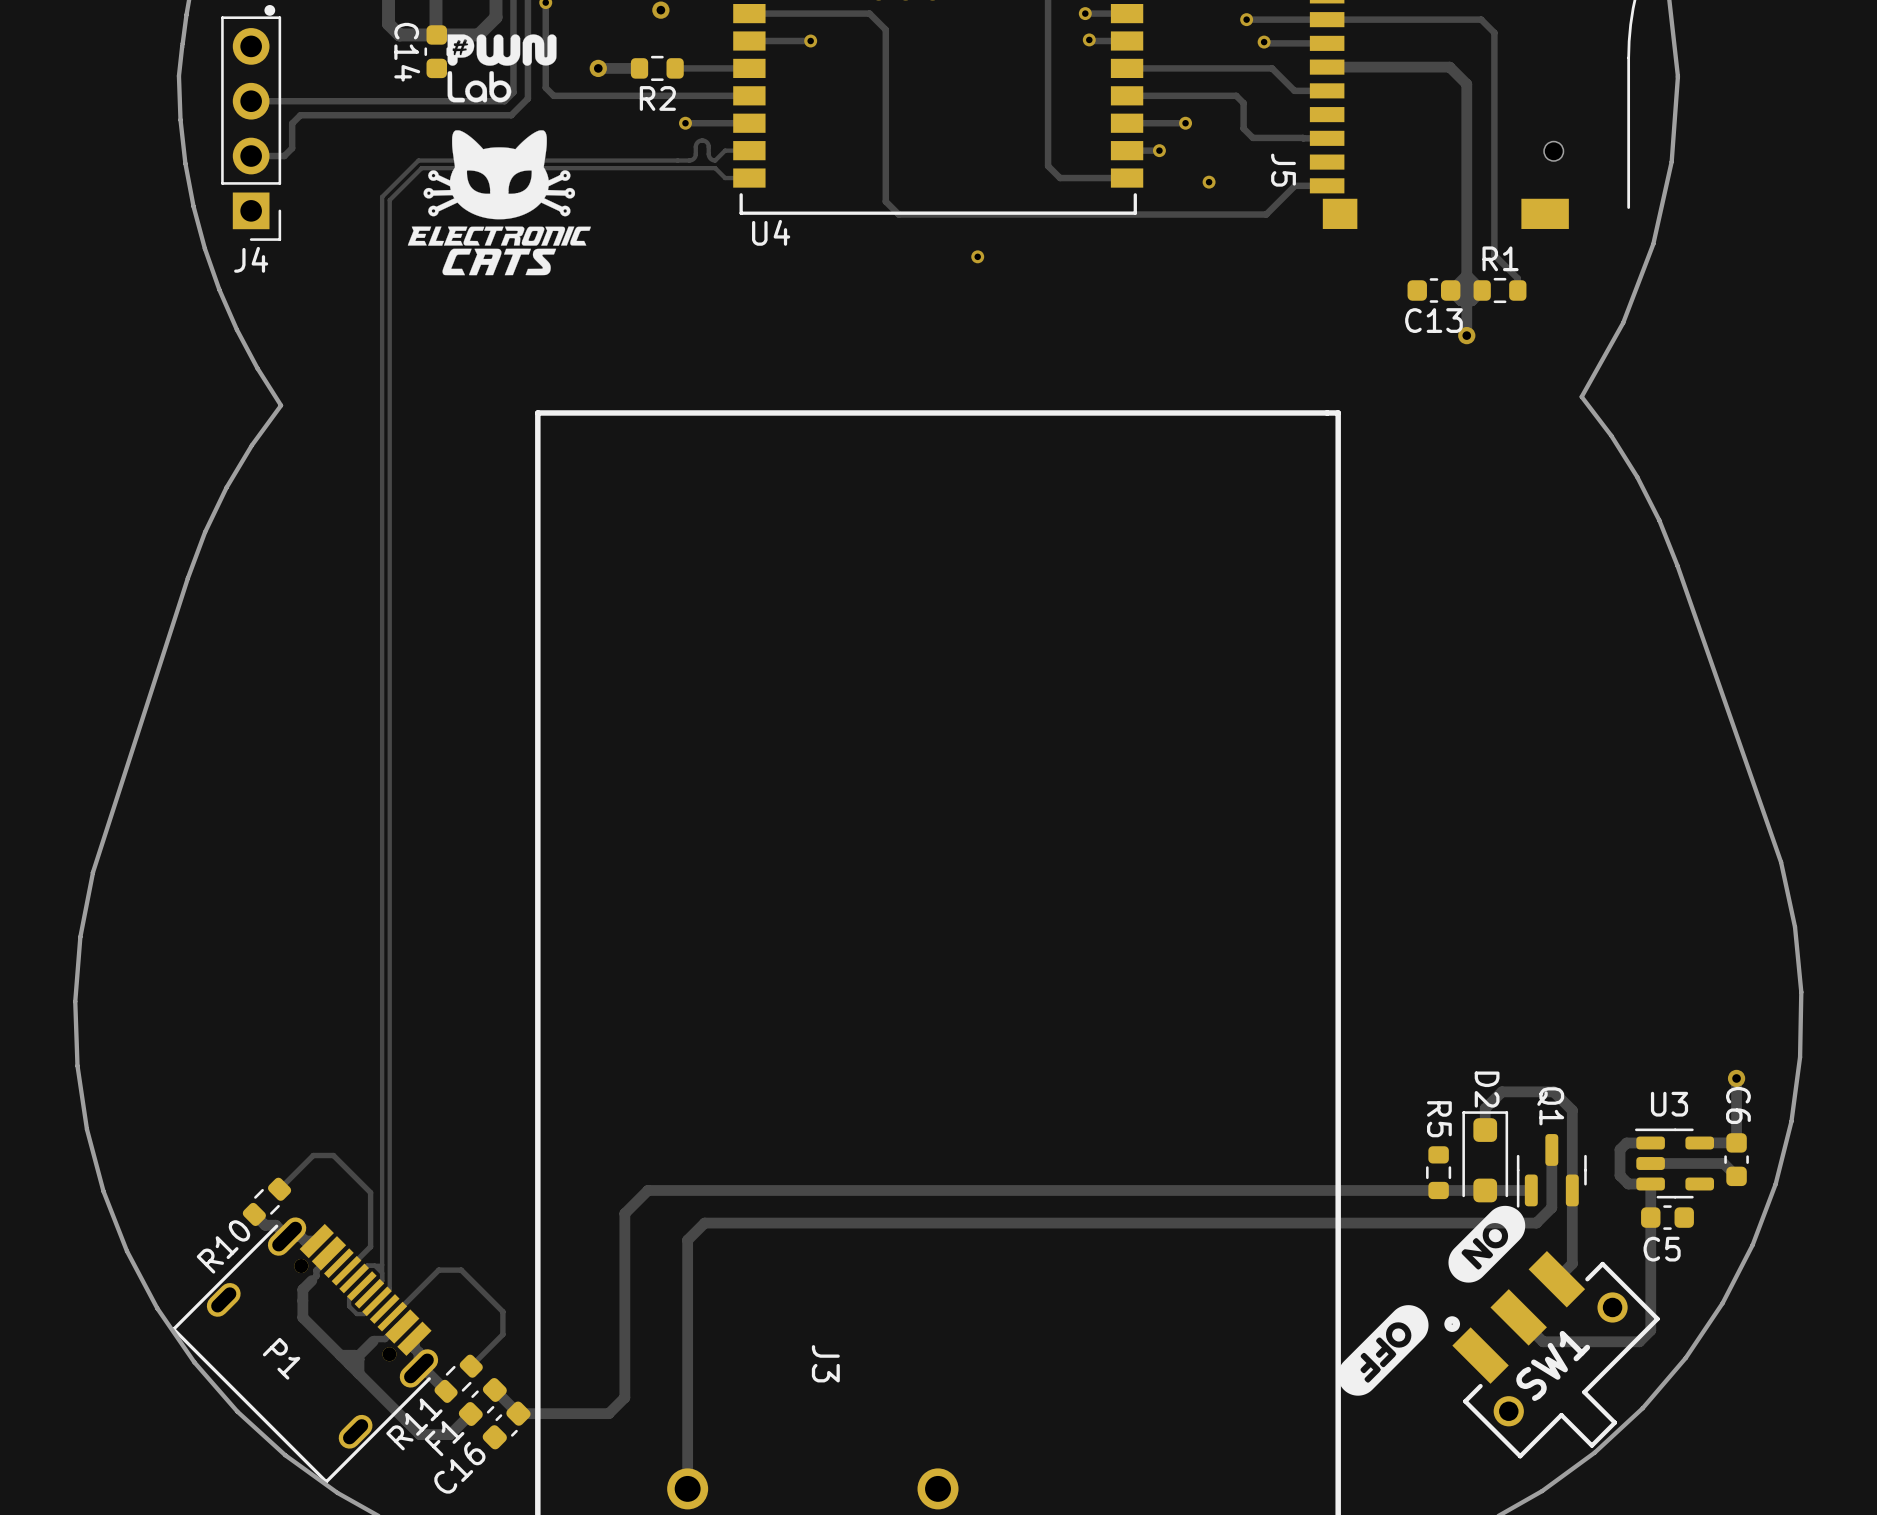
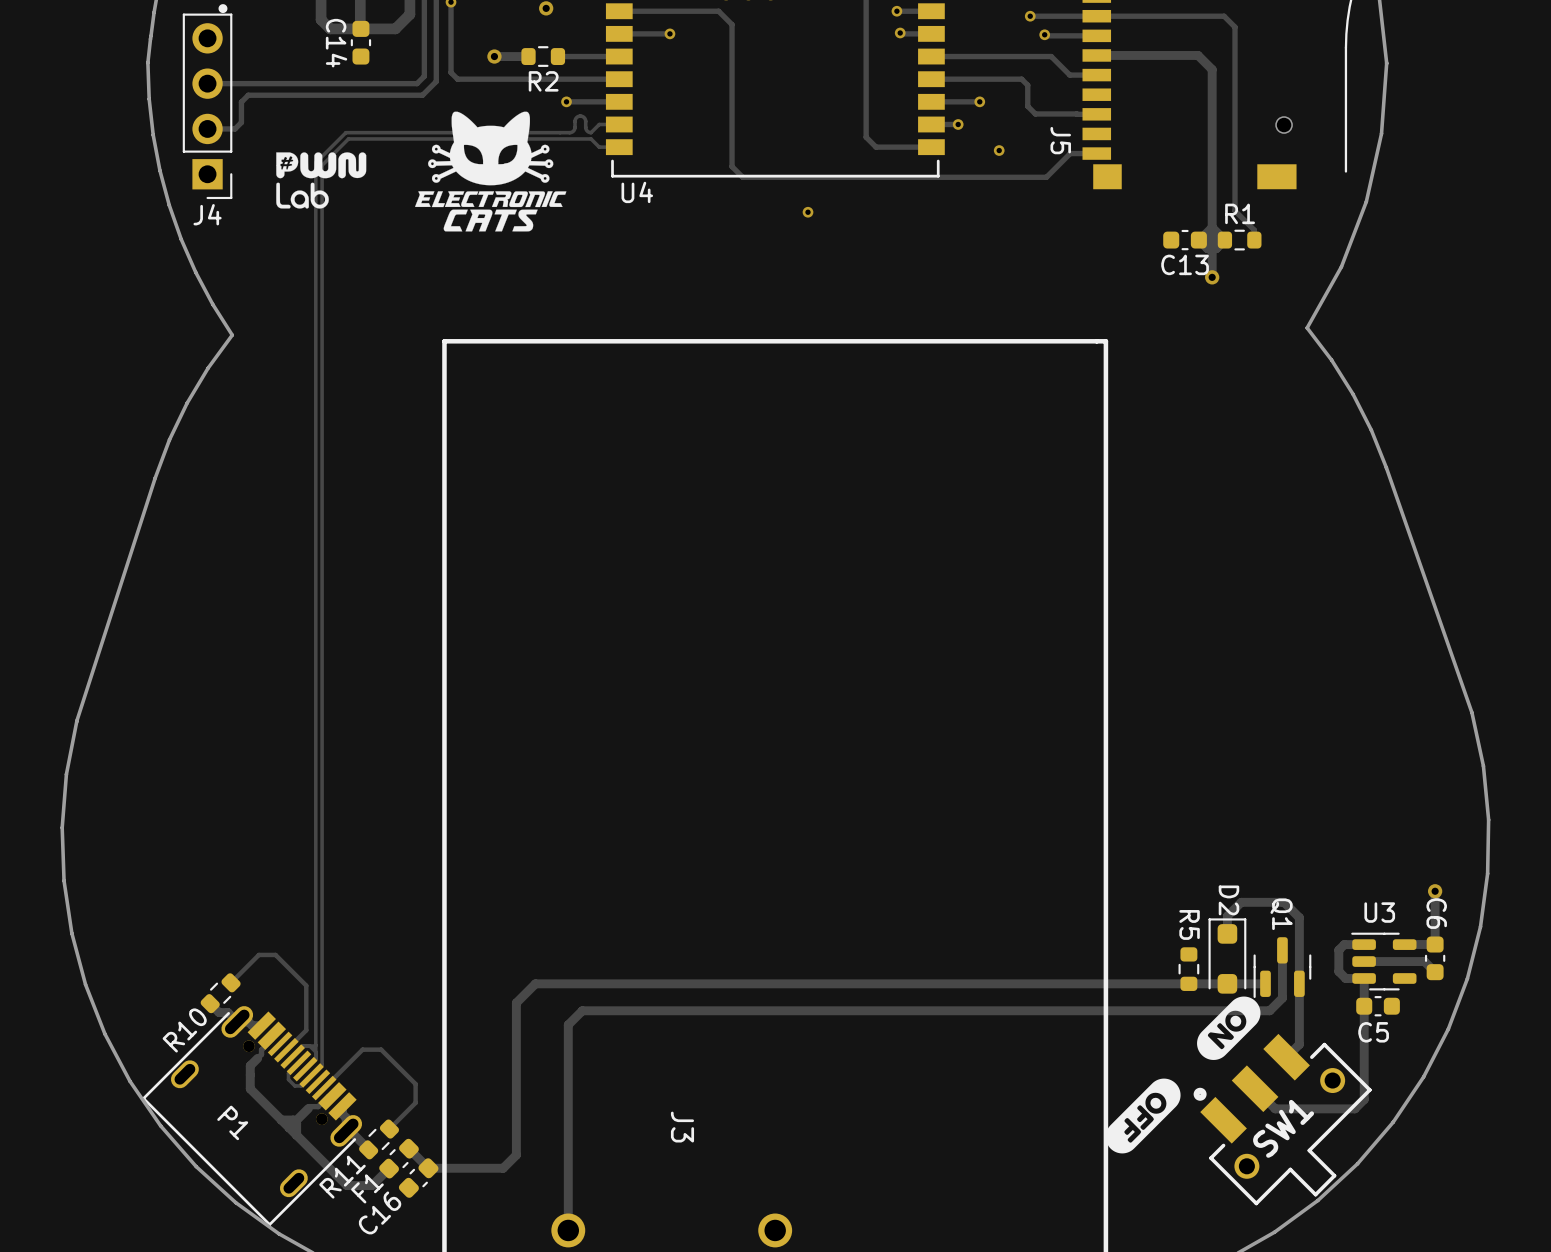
drawing position: (502, 68) -> (321, 180)
drawing position: (499, 202) -> (490, 171)

